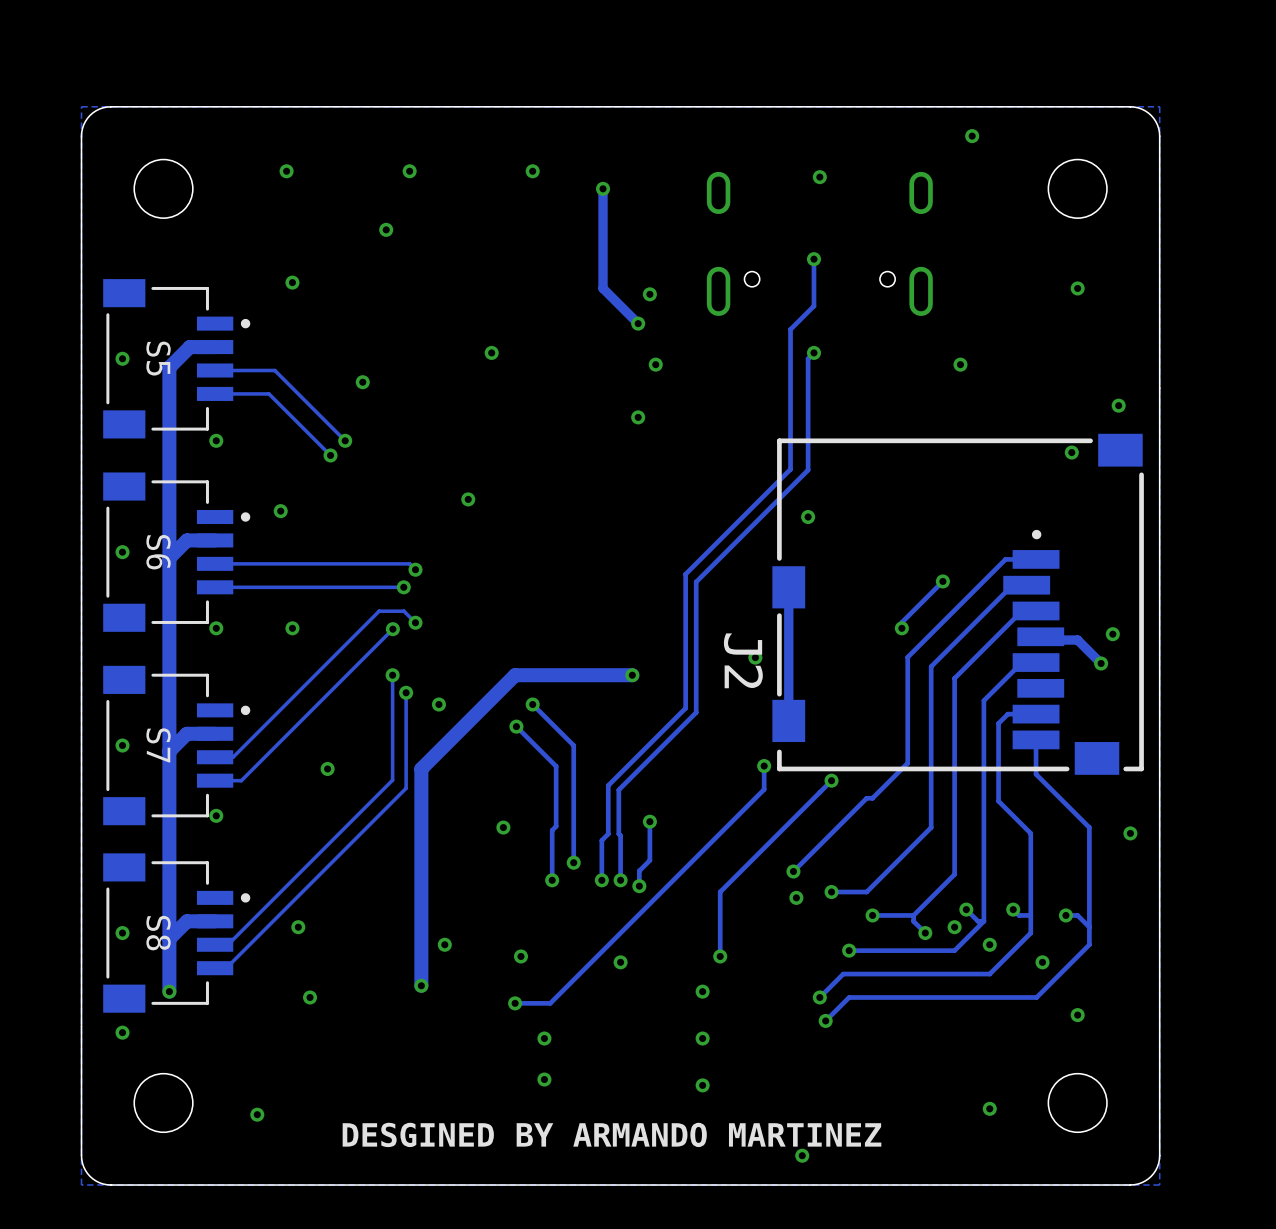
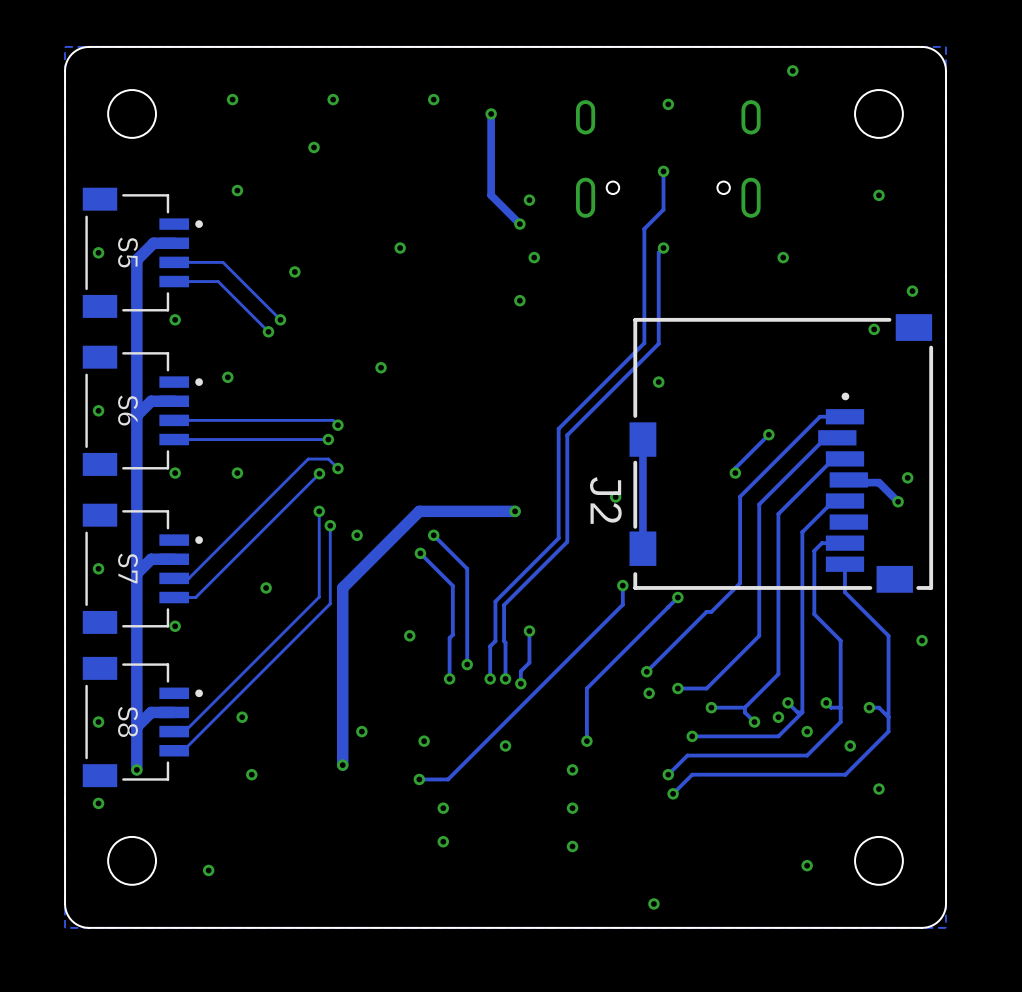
text: DESGINED BY ARMANDO MARTINEZ (611, 1134) -> none

